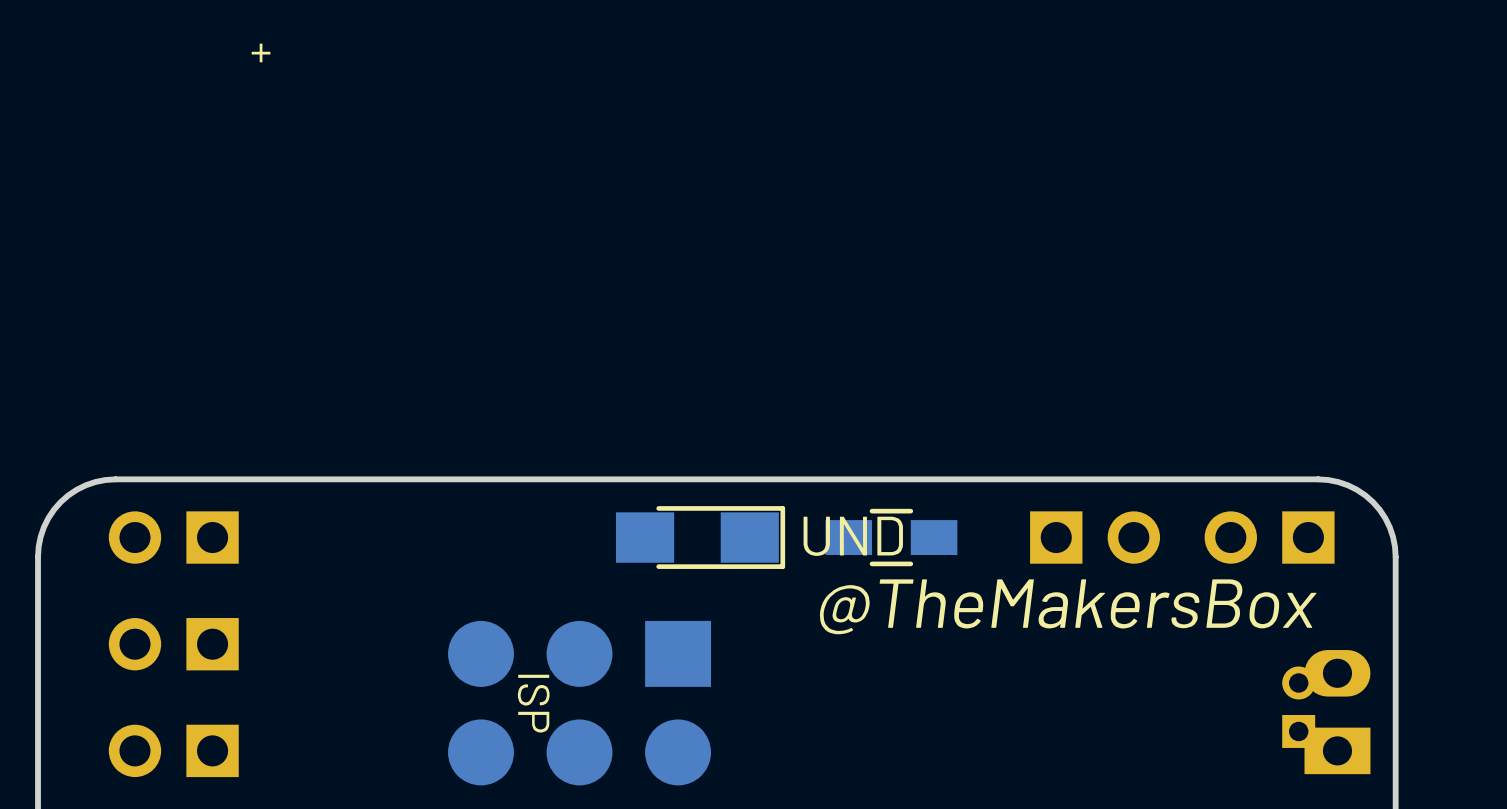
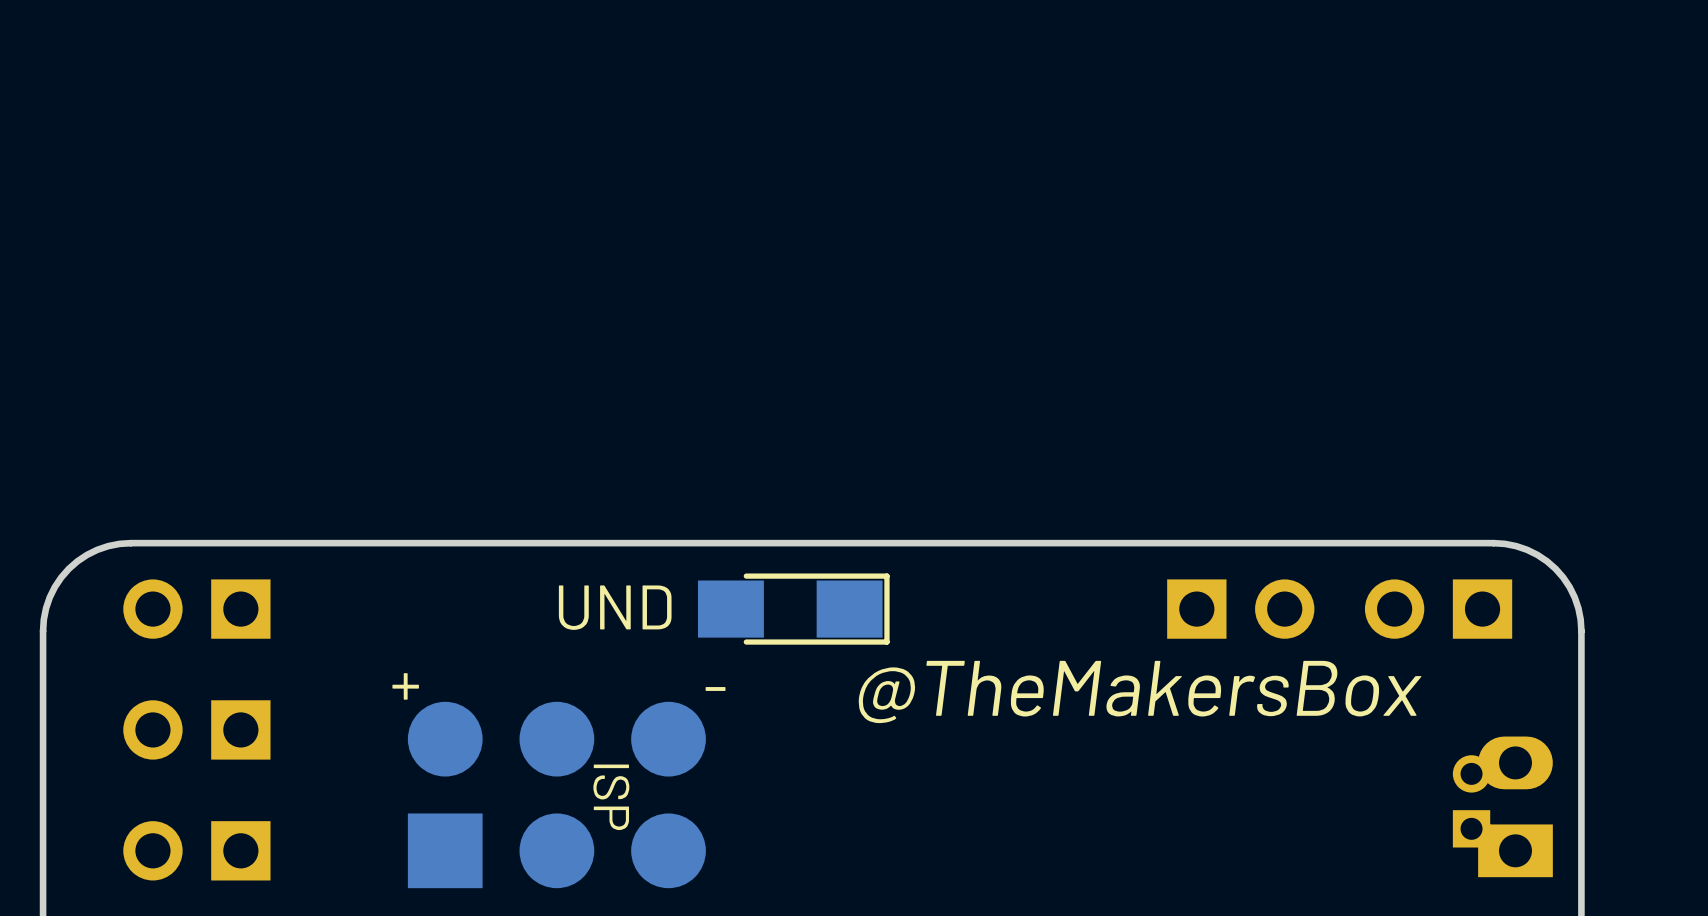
text position: + (261, 52) -> + (405, 686)
part value position: UND (853, 536) -> UND (615, 607)
part: (891, 537) -> none
text position: @TheMakersBox (1067, 606) -> @TheMakersBox (1139, 691)
text: none -> - (715, 688)
part rotation: 0° (579, 703) -> 180° (556, 794)

